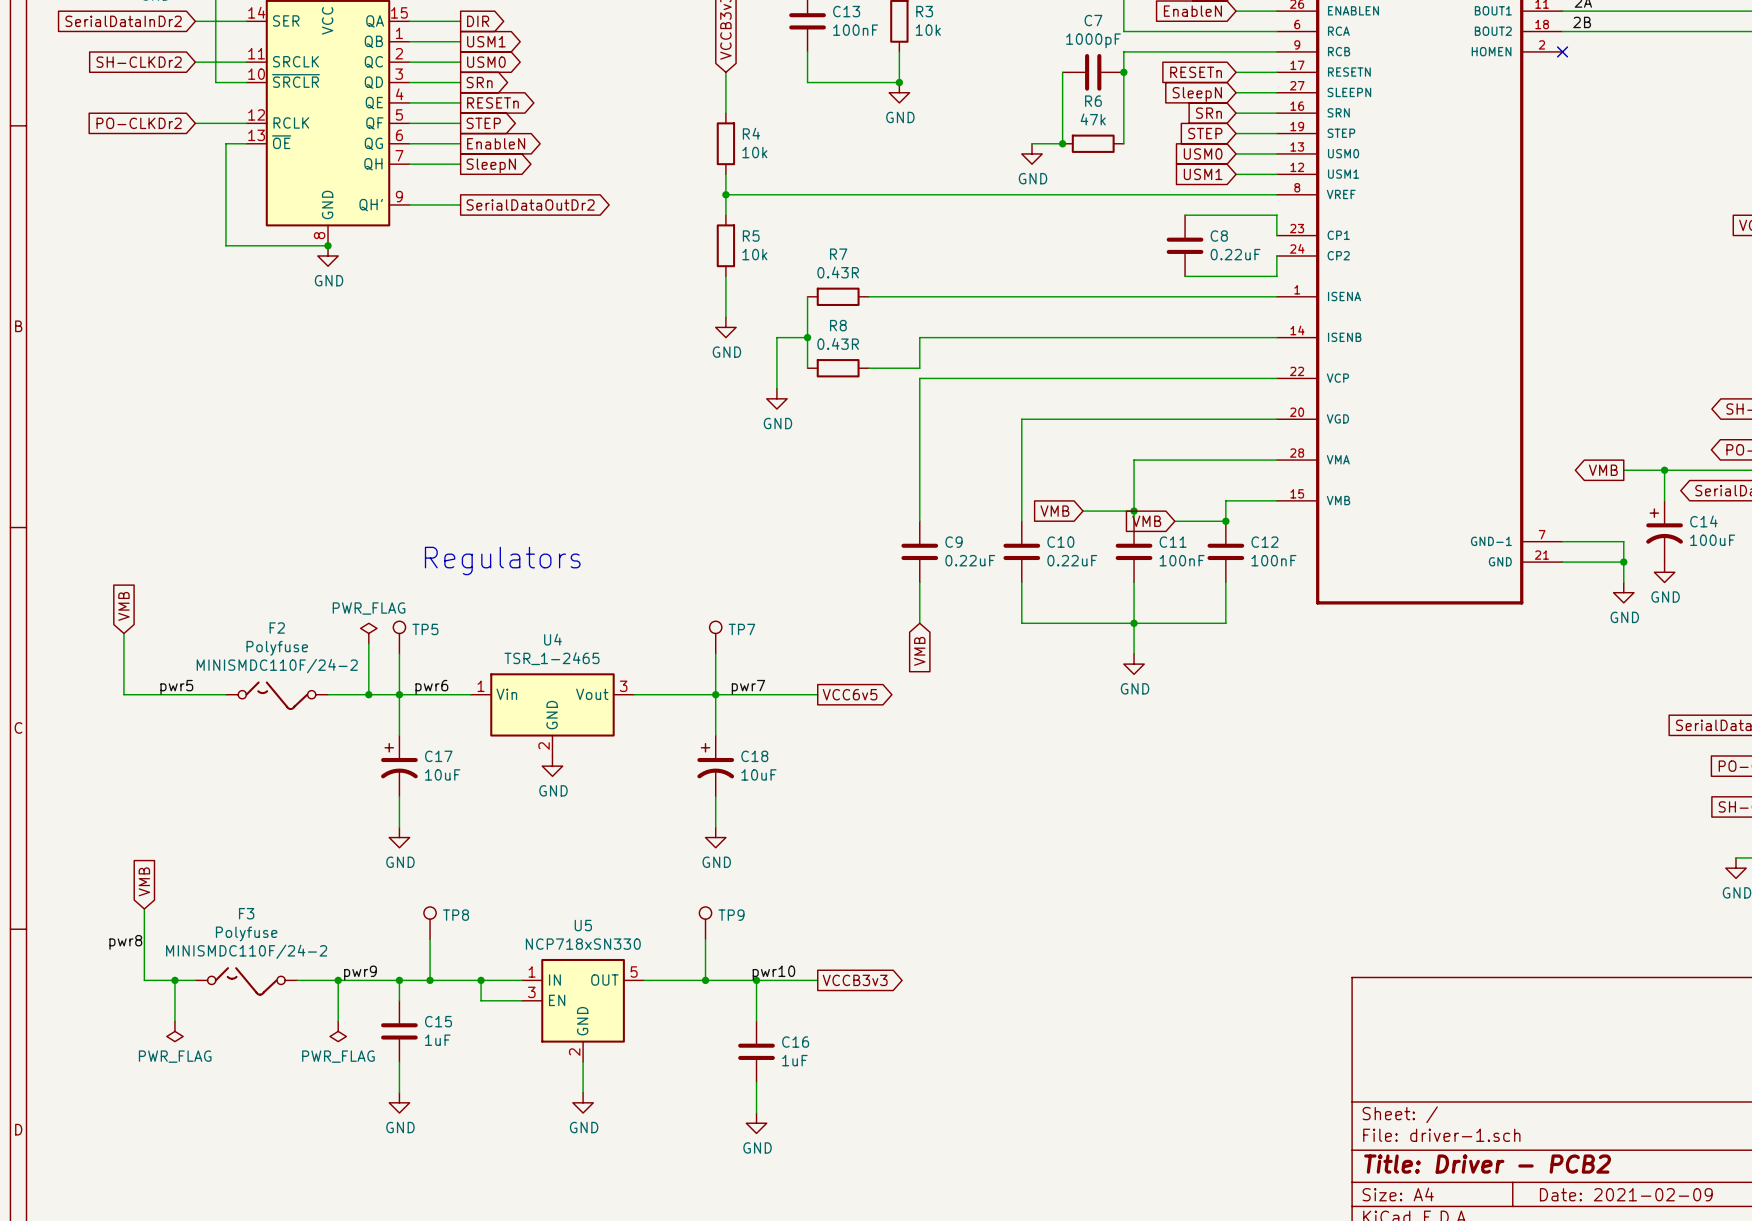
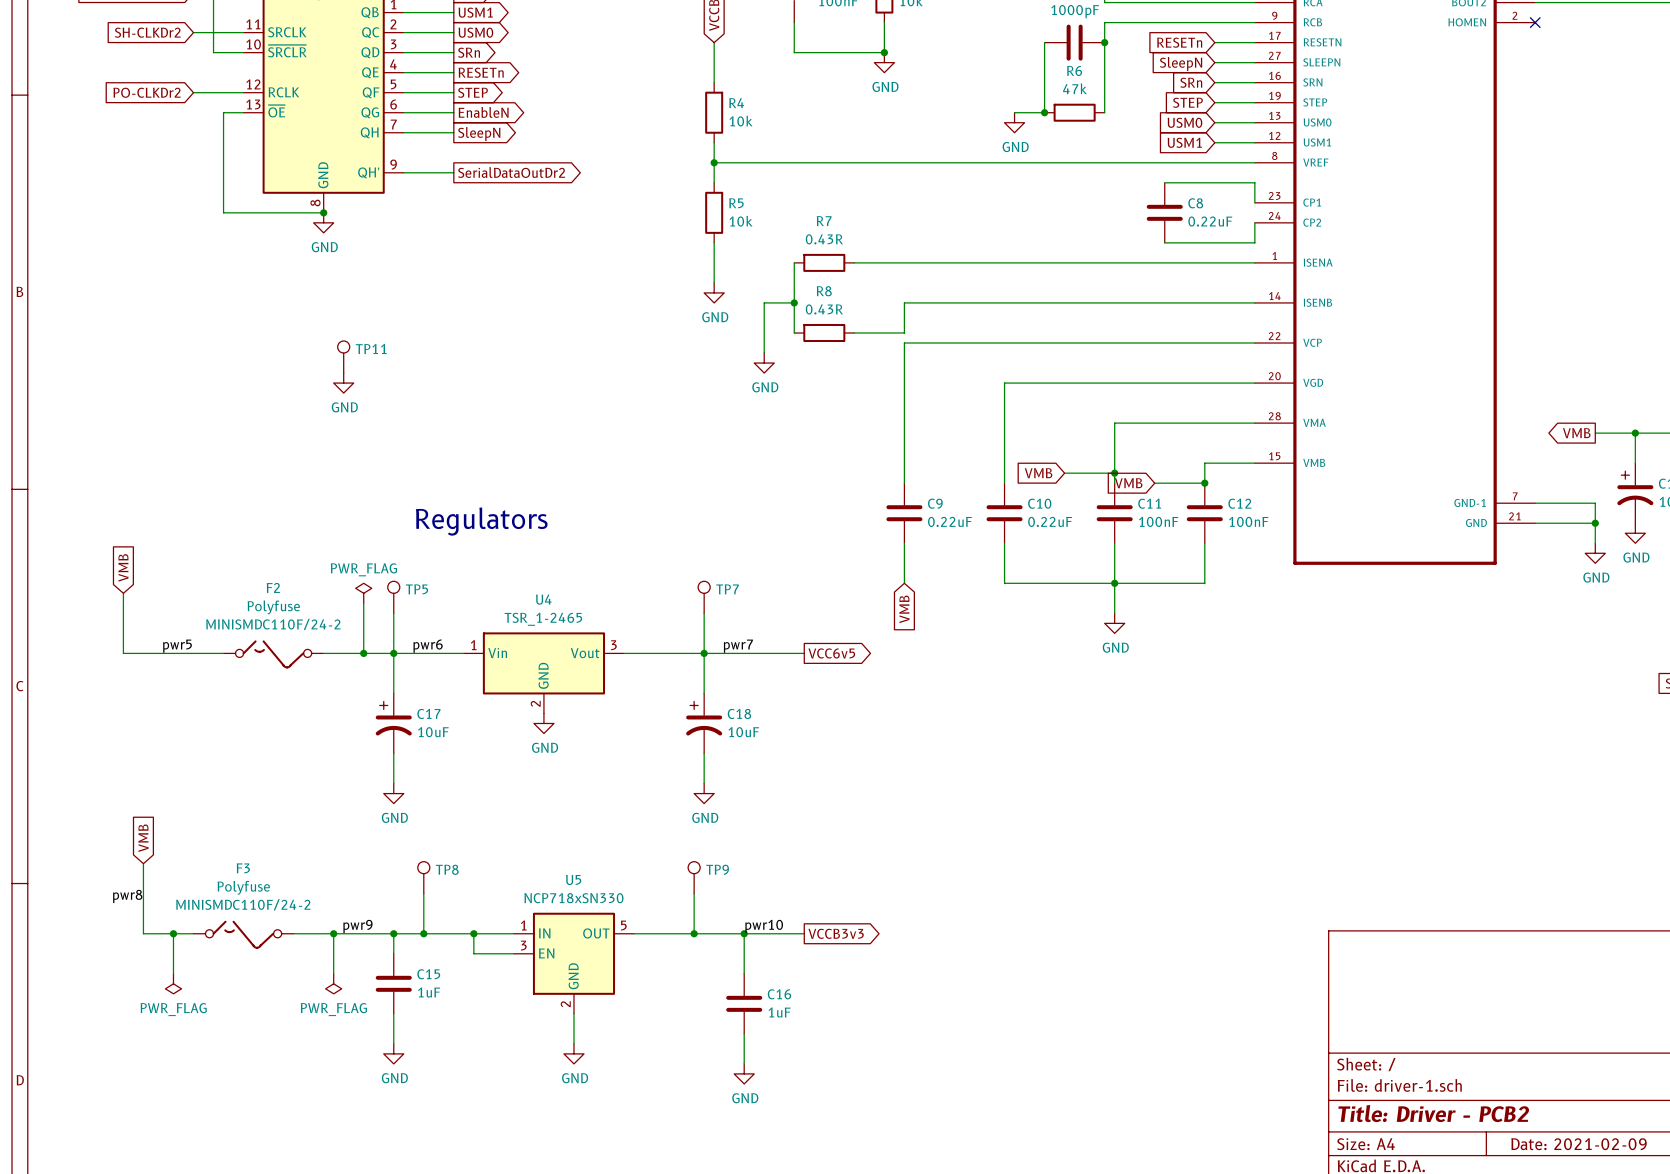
TP11: none -> (343, 357)
power symbol: none -> GND (343, 383)

